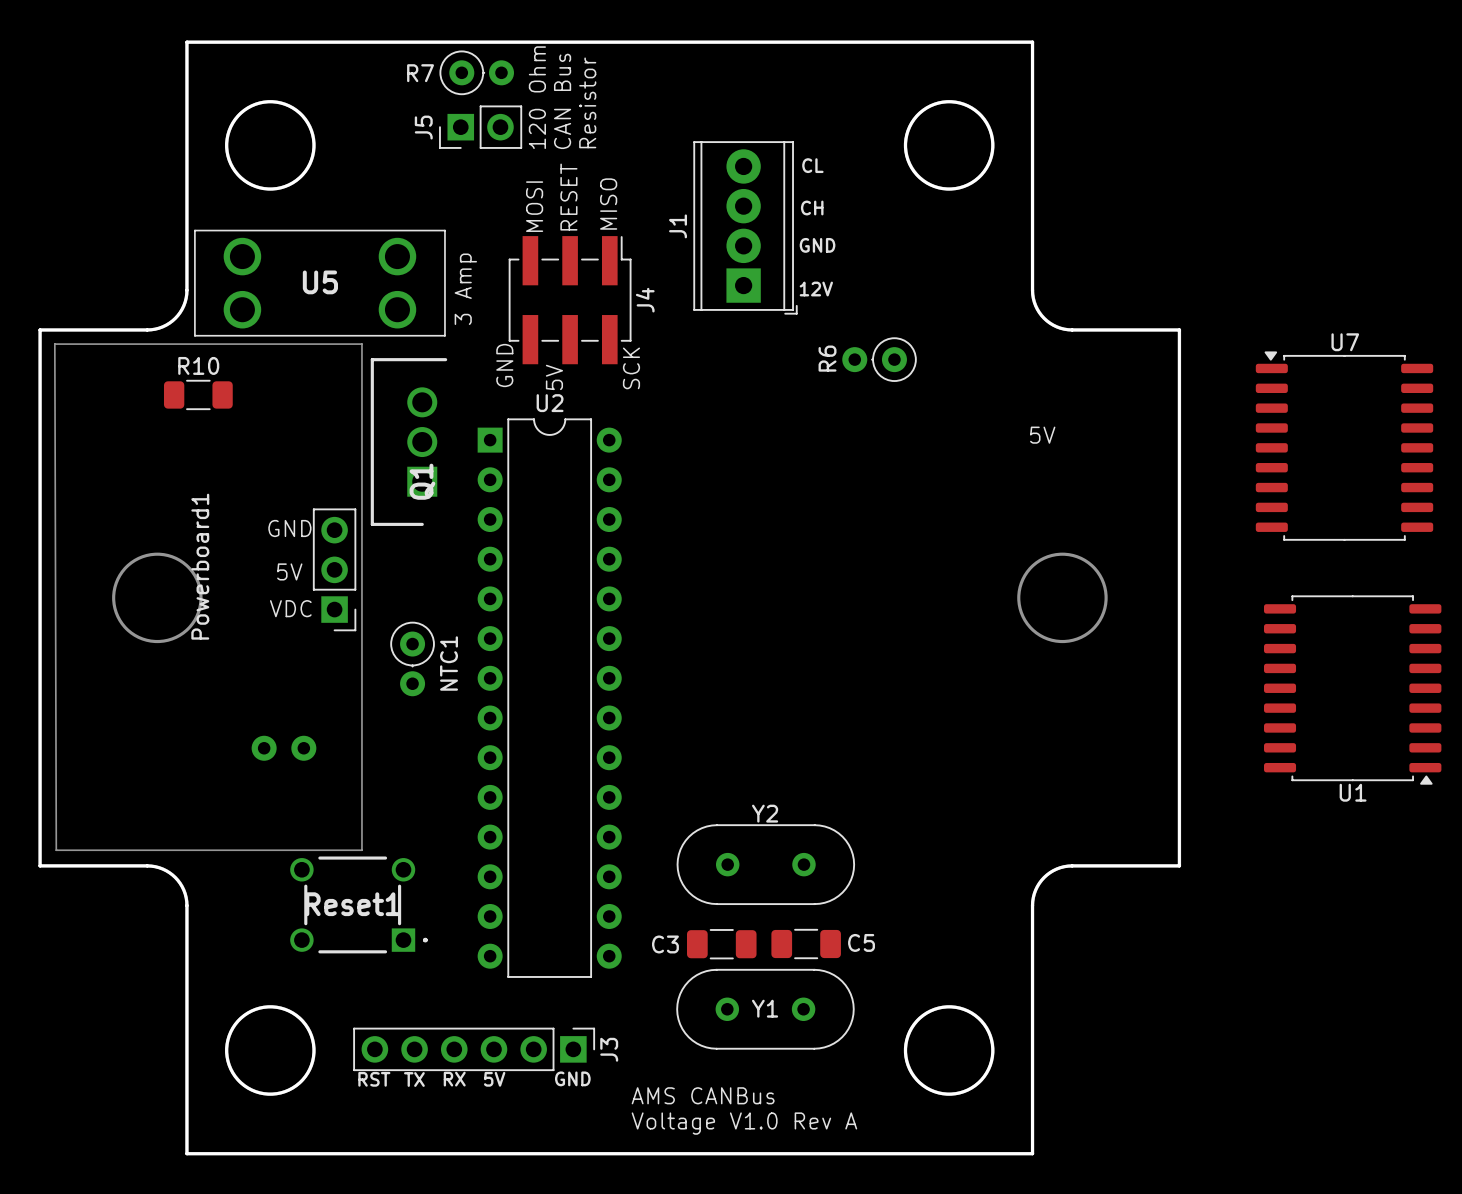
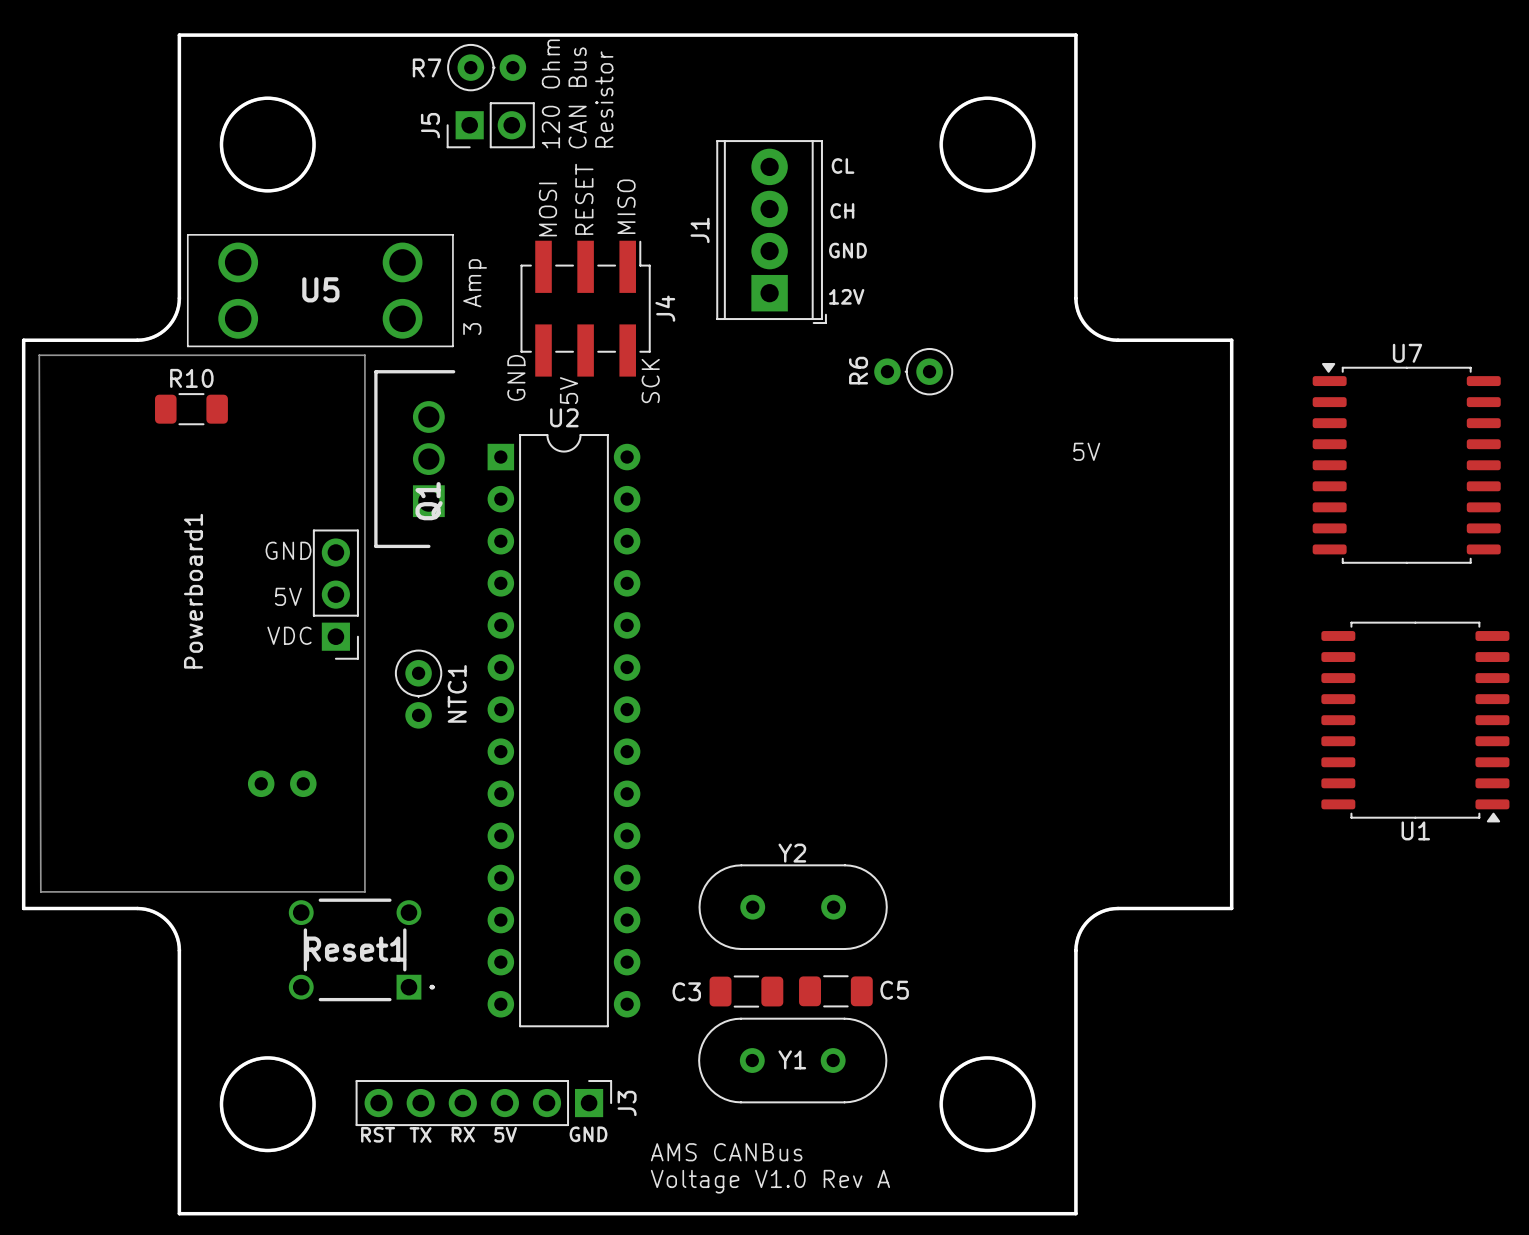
drawing: [112, 552, 203, 644] -> none
drawing: [1017, 552, 1108, 644] -> none

